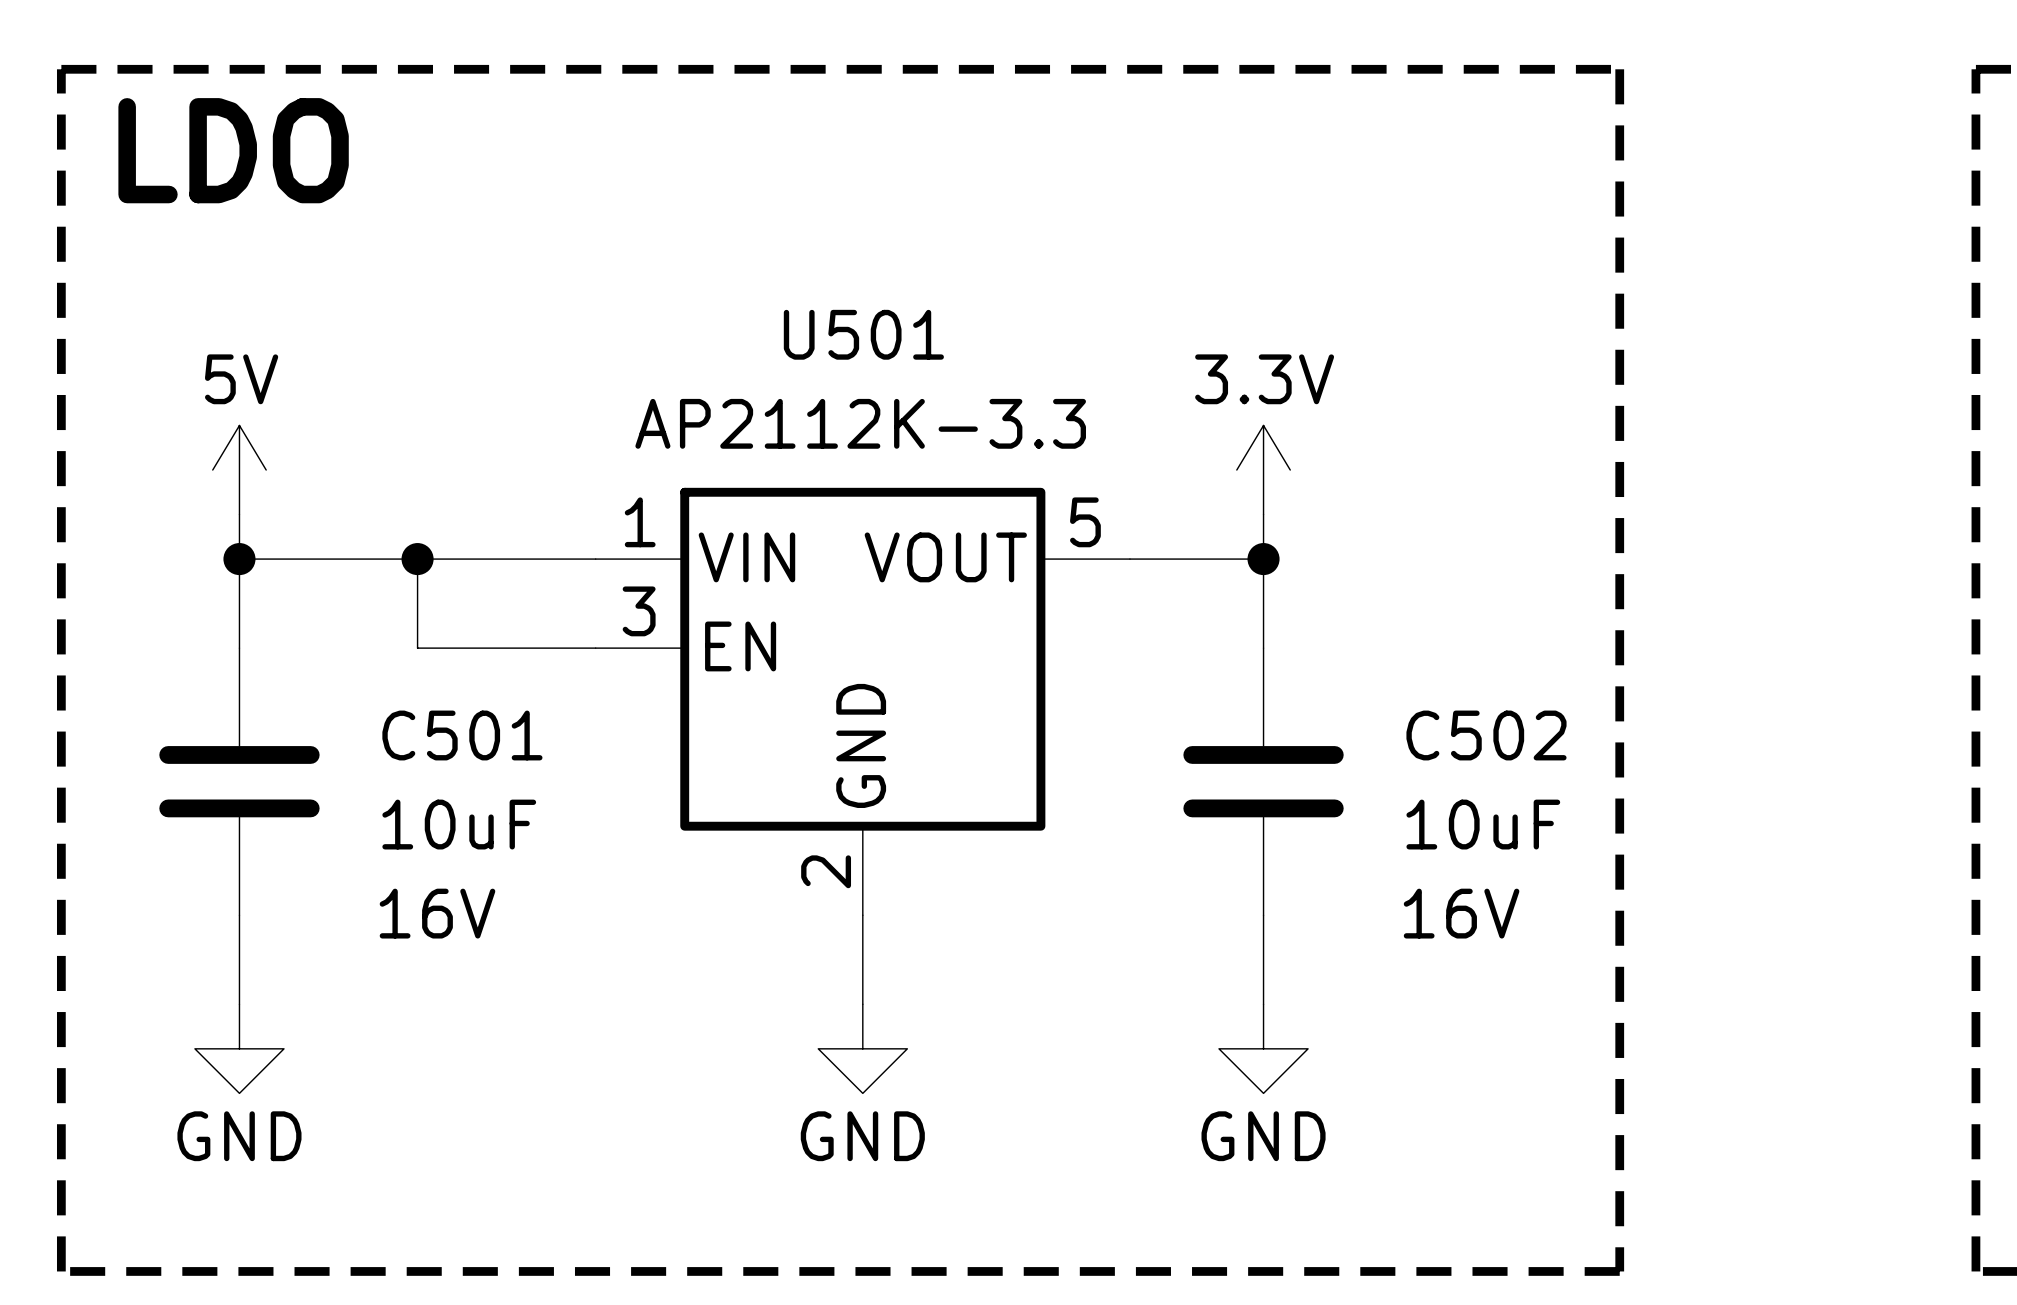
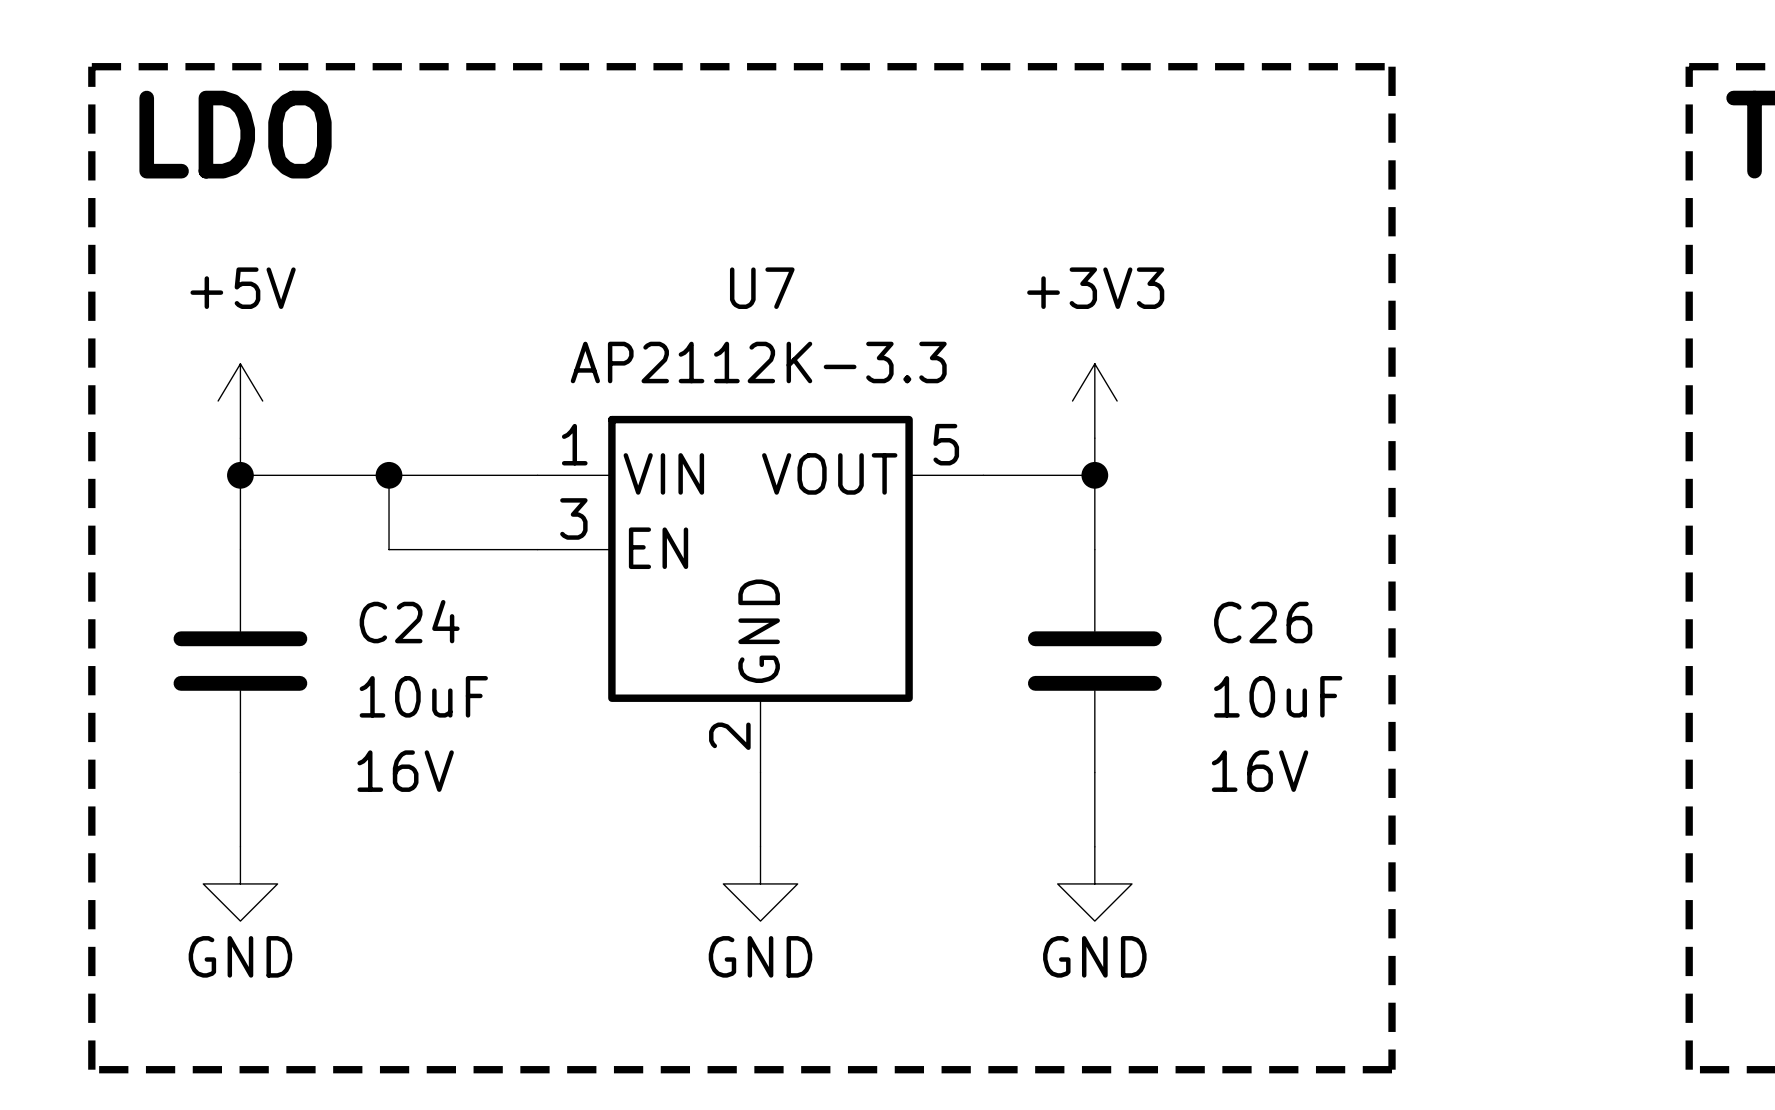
U501 name: U501 (863, 334) -> U7 (762, 288)
power symbol: 5V (239, 470) -> +5V (240, 401)
power symbol: 3.3V (1263, 470) -> +3V3 (1094, 401)
C501 name: C501 (462, 735) -> C24 (409, 621)
C502 name: C502 (1486, 735) -> C26 (1263, 622)

